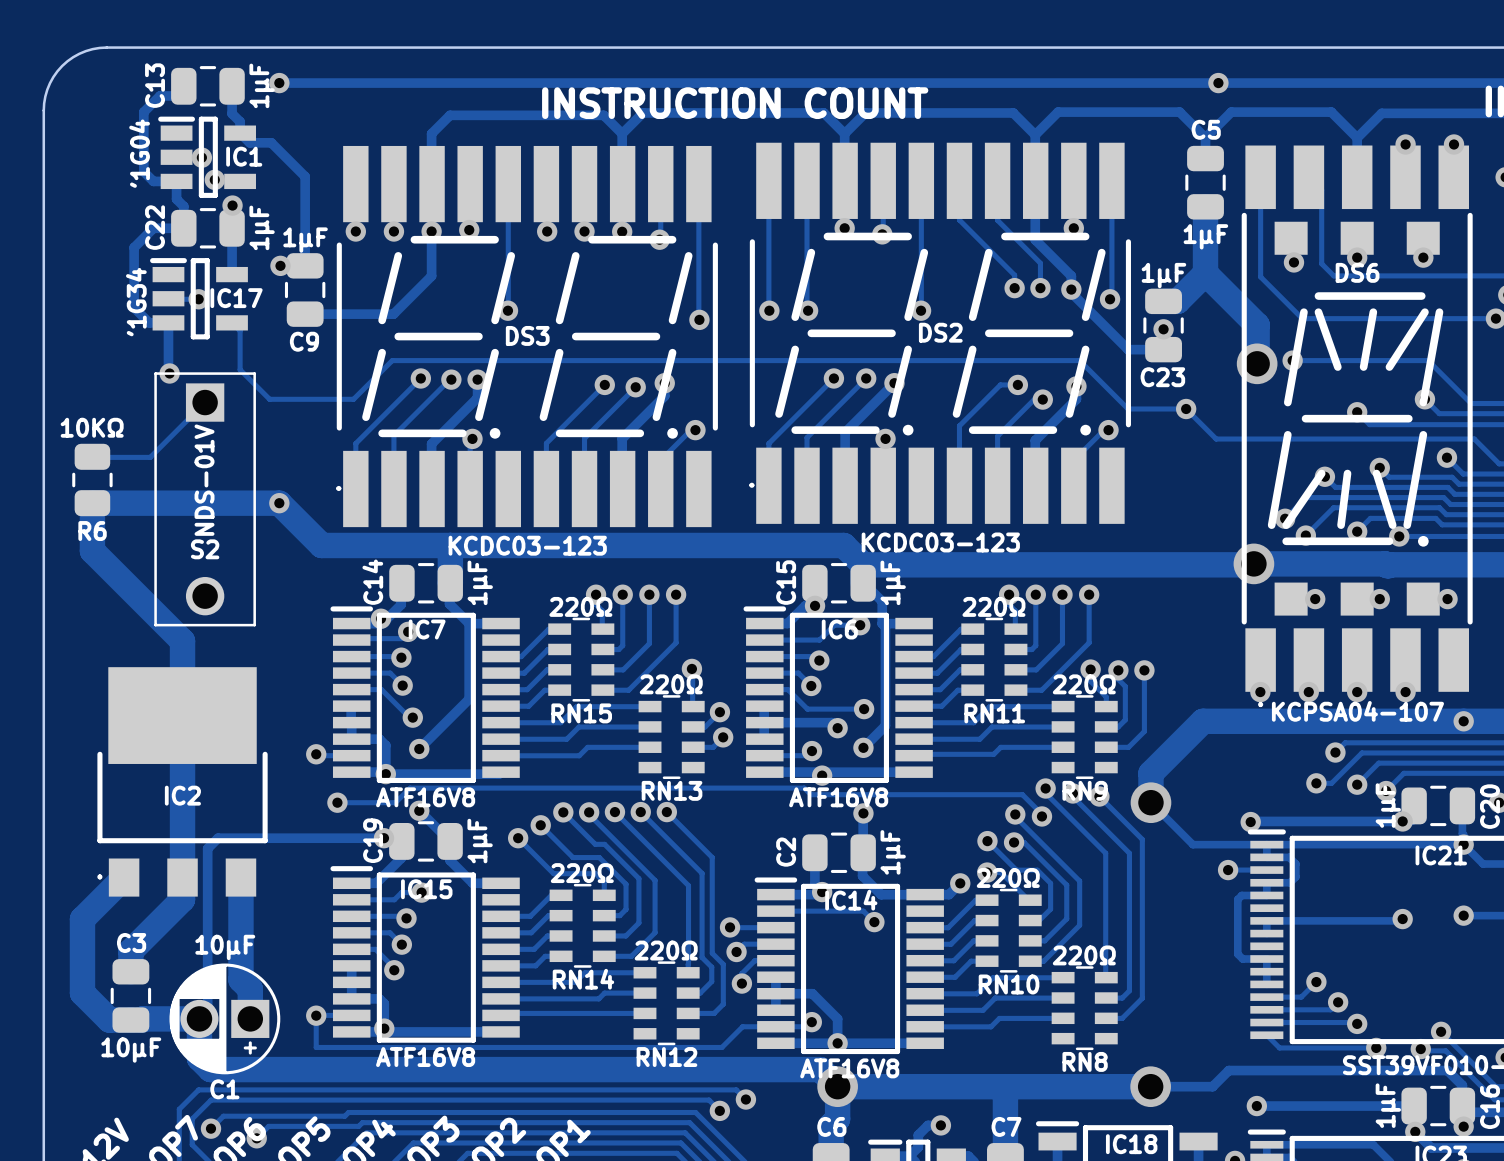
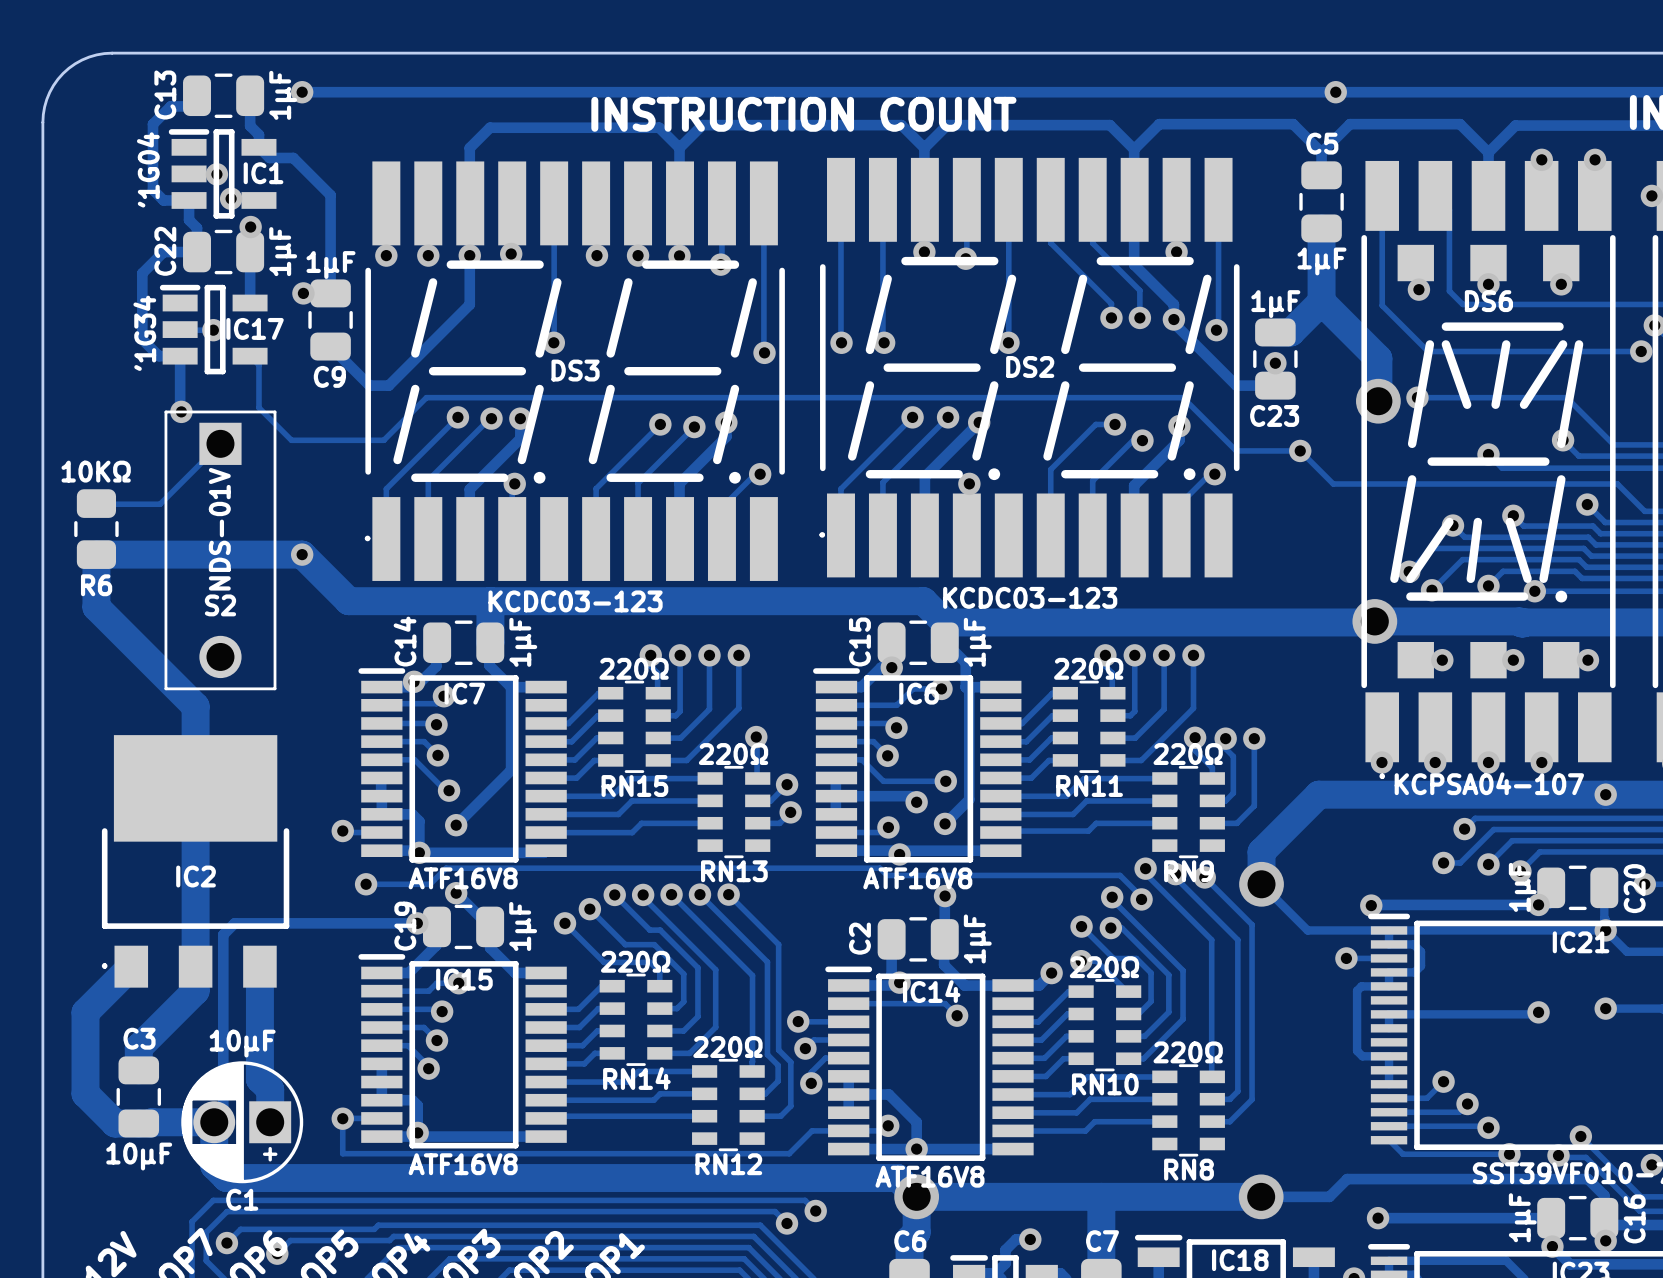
track: (305, 314) (393, 314) -> (330, 346) (369, 385) (388, 385) (427, 346)

